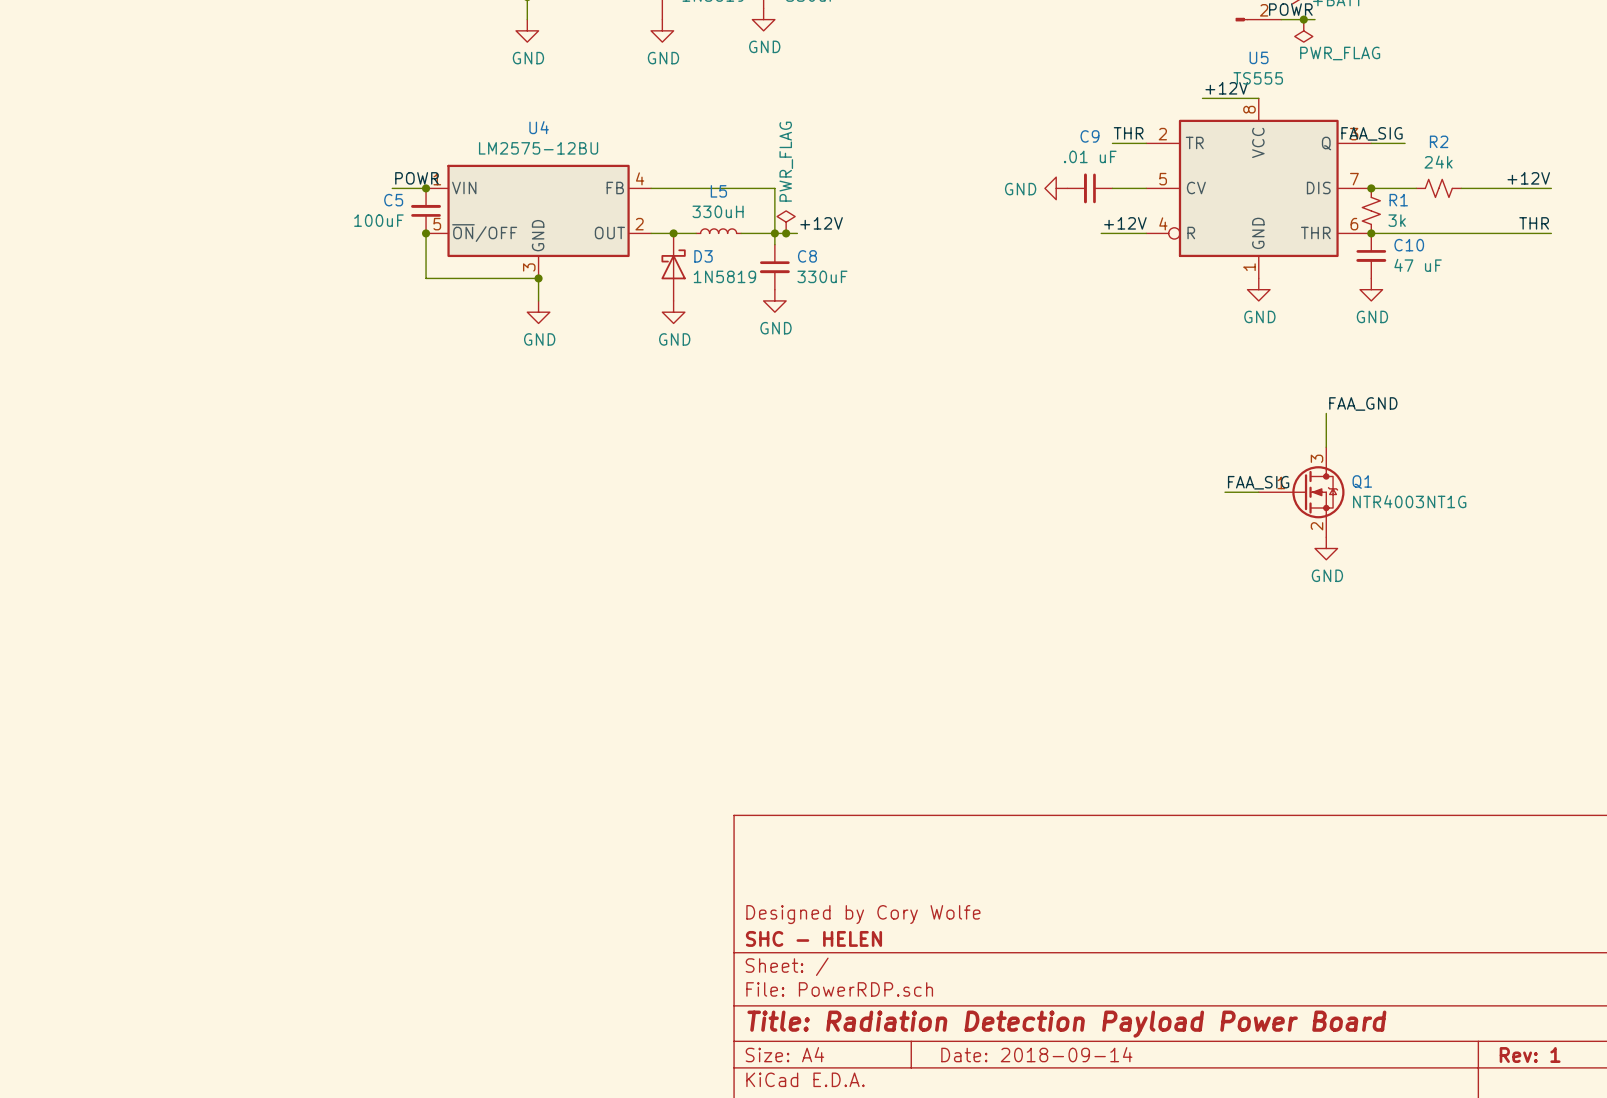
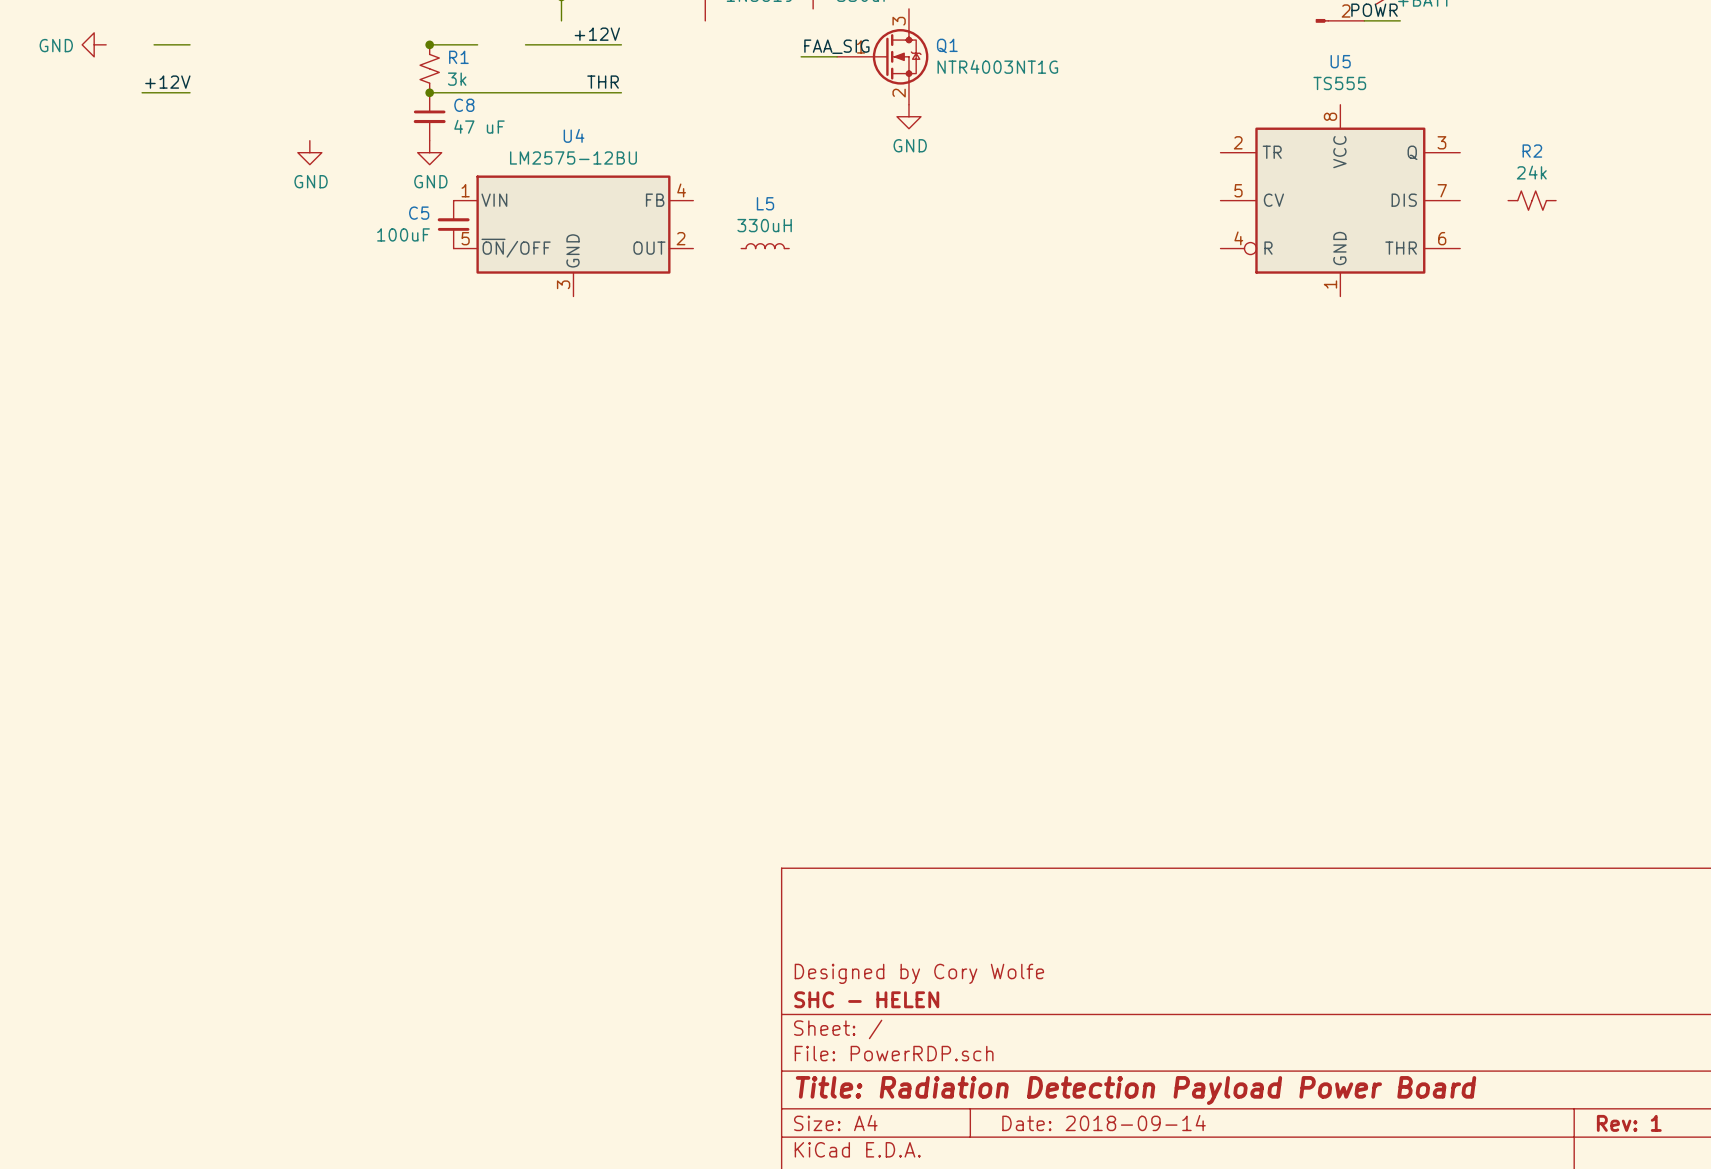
power symbol: GND (763, 19) -> none
junction: (1303, 19) -> none
power symbol: GND (527, 30) -> none
power symbol: GND (662, 30) -> none
power symbol: PWR_FLAG (1303, 30) -> none
label: none -> +12V (597, 34)
power symbol: none -> GND (94, 44)
wire: none -> (154, 44) (190, 44)
wire: none -> (429, 44) (477, 44)
junction: none -> (429, 44)
wire: none -> (525, 44) (621, 44)
label: none -> FAA_SIG (836, 46)
wire: none -> (801, 56) (837, 56)
label: none -> +12V (167, 82)
label: none -> THR (603, 82)
wire: none -> (142, 92) (190, 92)
wire: none -> (429, 92) (621, 92)
junction: none -> (429, 92)
label: +12V (1226, 88) -> none
wire: (1202, 98) (1258, 98) -> none
power symbol: none -> GND (908, 116)
label: THR (1128, 133) -> none
label: FAA_SIG (1372, 133) -> none
power symbol: none -> GND (309, 152)
power symbol: none -> GND (429, 152)
wire: (1112, 143) (1146, 143) -> none
wire: (1371, 143) (1405, 143) -> none
label: POWR (417, 178) -> none
label: +12V (1528, 178) -> none
wire: (392, 188) (426, 188) -> none
junction: (426, 188) -> none
wire: (651, 188) (774, 188) (774, 244) -> none
power symbol: GND (1056, 188) -> none
C9: .01 uF (1089, 188) -> none
wire: (1112, 188) (1146, 188) -> none
wire: (1371, 188) (1416, 188) -> none
junction: (1371, 188) -> none
wire: (1461, 188) (1551, 188) -> none
R1 position: (1371, 210) -> (429, 68)
power symbol: PWR_FLAG (786, 222) -> none
label: +12V (821, 223) -> none
label: +12V (1125, 223) -> none
label: THR (1534, 223) -> none
wire: (426, 233) (426, 278) (538, 278) (538, 300) -> none
junction: (426, 233) -> none
wire: (651, 233) (696, 233) -> none
junction: (673, 233) -> none
wire: (741, 233) (797, 233) -> none
junction: (774, 233) -> none
junction: (786, 233) -> none
wire: (1101, 233) (1146, 233) -> none
wire: (1371, 233) (1551, 233) -> none
junction: (1371, 233) -> none
C10: 47 uF (1371, 255) -> none
D3: 1N5819 (673, 267) -> none
C8 position: (774, 267) -> (429, 116)
C8 value: 330uF (822, 276) -> 47 uF (479, 126)
junction: (538, 278) -> none
power symbol: GND (1258, 289) -> none
power symbol: GND (1371, 289) -> none
power symbol: GND (774, 300) -> none
power symbol: GND (538, 312) -> none
power symbol: GND (673, 312) -> none
label: FAA_GND (1363, 403) -> none
wire: (1326, 413) (1326, 447) -> none
label: FAA_SIG (1258, 482) -> none
wire: (1225, 492) (1258, 492) -> none
Q1 position: (1301, 492) -> (882, 56)
power symbol: GND (1326, 548) -> none

